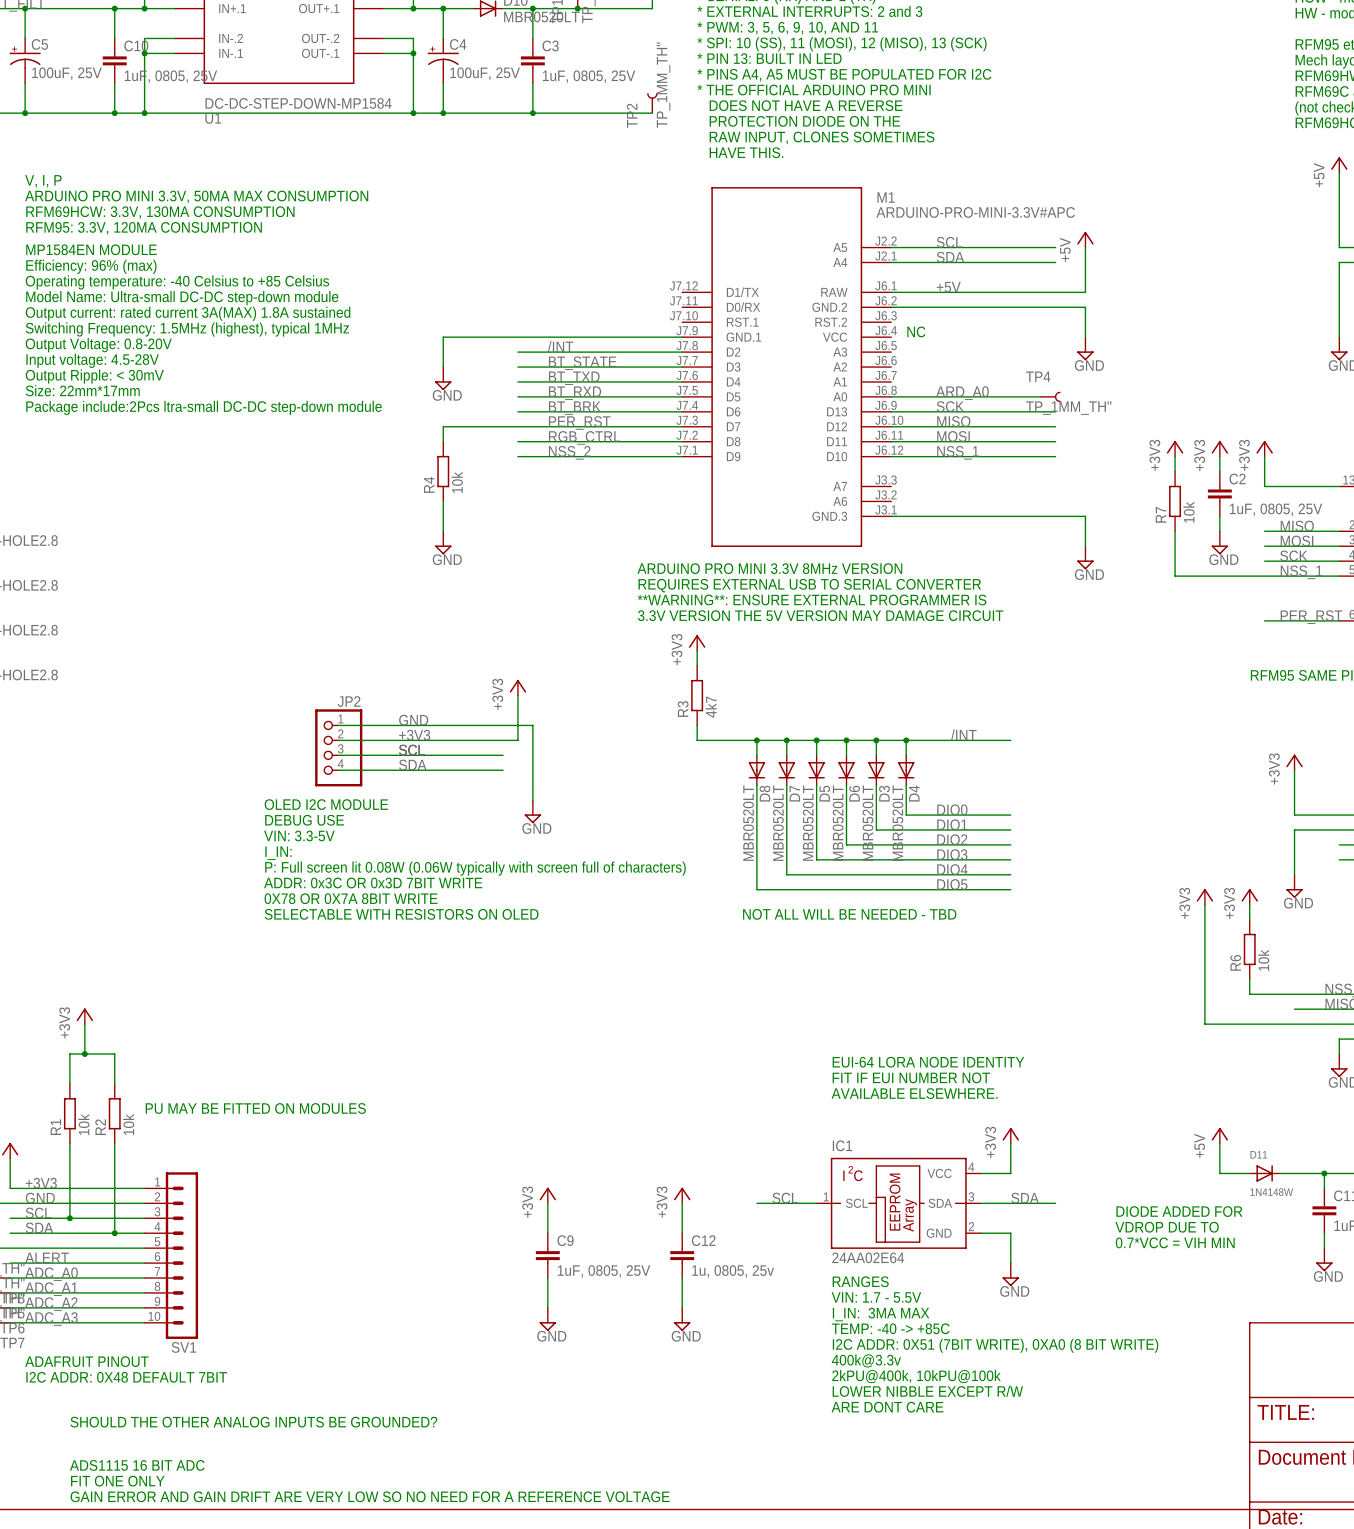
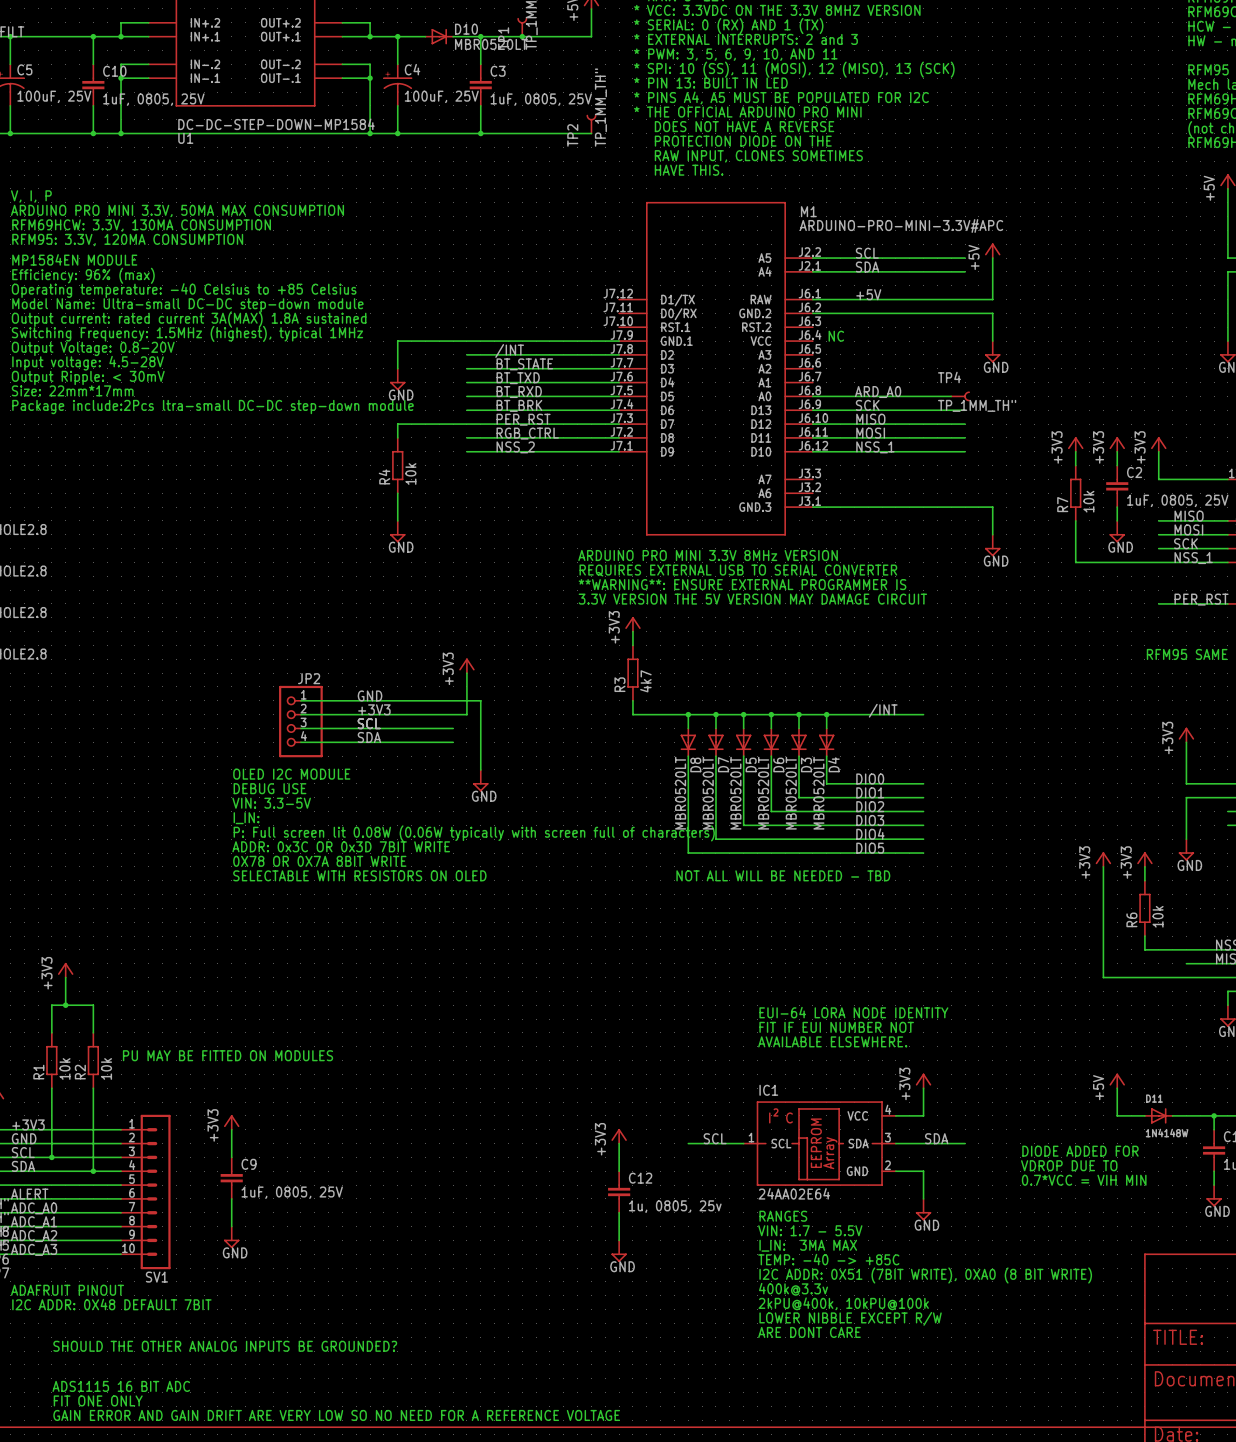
power symbol: none -> +3V3 (231, 1122)
wire: none -> (231, 1129) (231, 1157)
power symbol: +3V3 (547, 1195) -> none
wire: (547, 1203) (547, 1233) -> none
C9 position: (547, 1255) -> (231, 1178)
wire: none -> (231, 1198) (231, 1226)
wire: (547, 1278) (547, 1307) -> none
power symbol: none -> GND (231, 1237)
power symbol: GND (547, 1319) -> none

